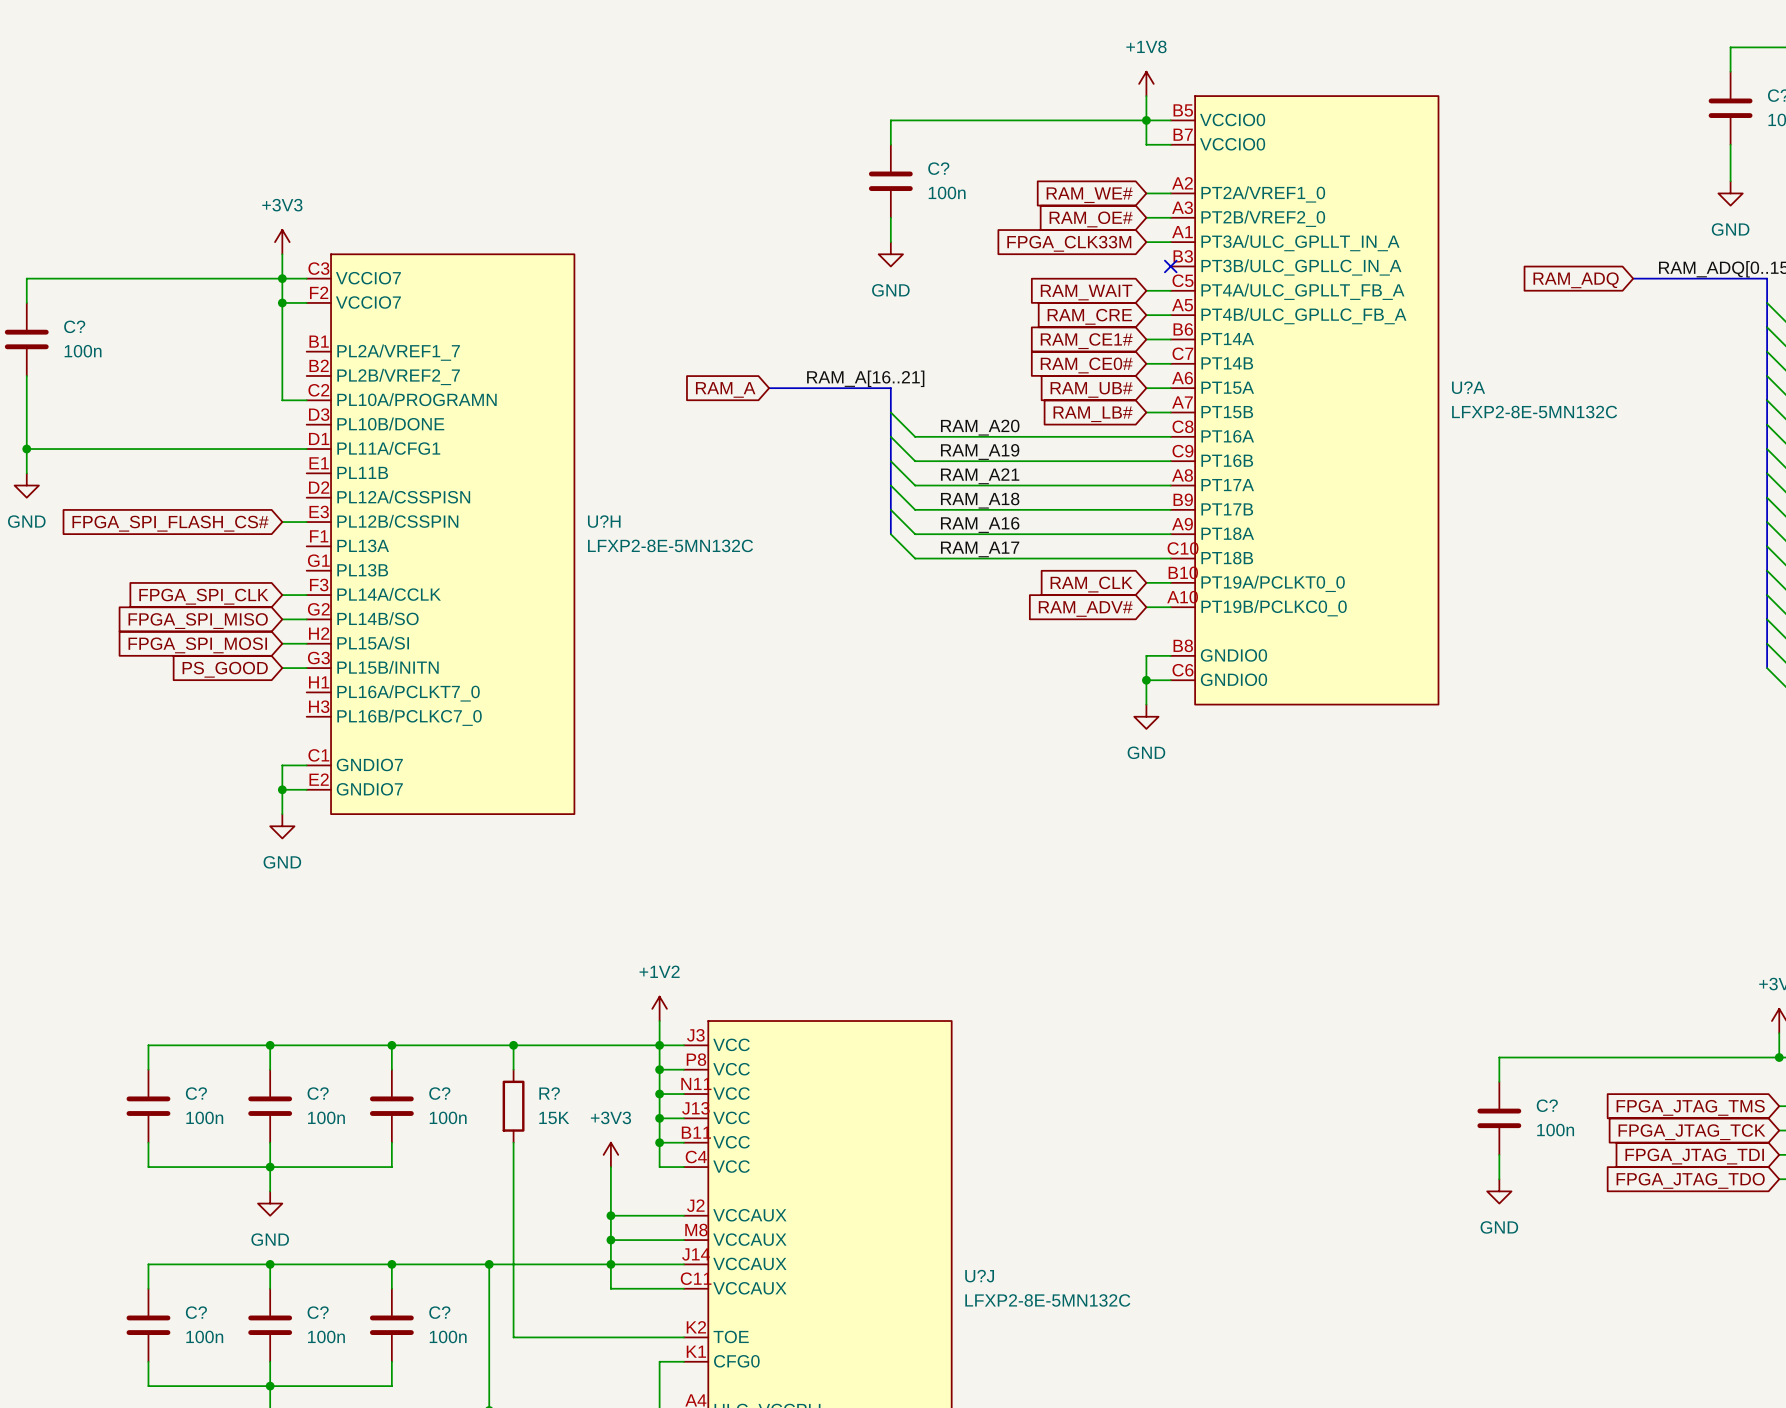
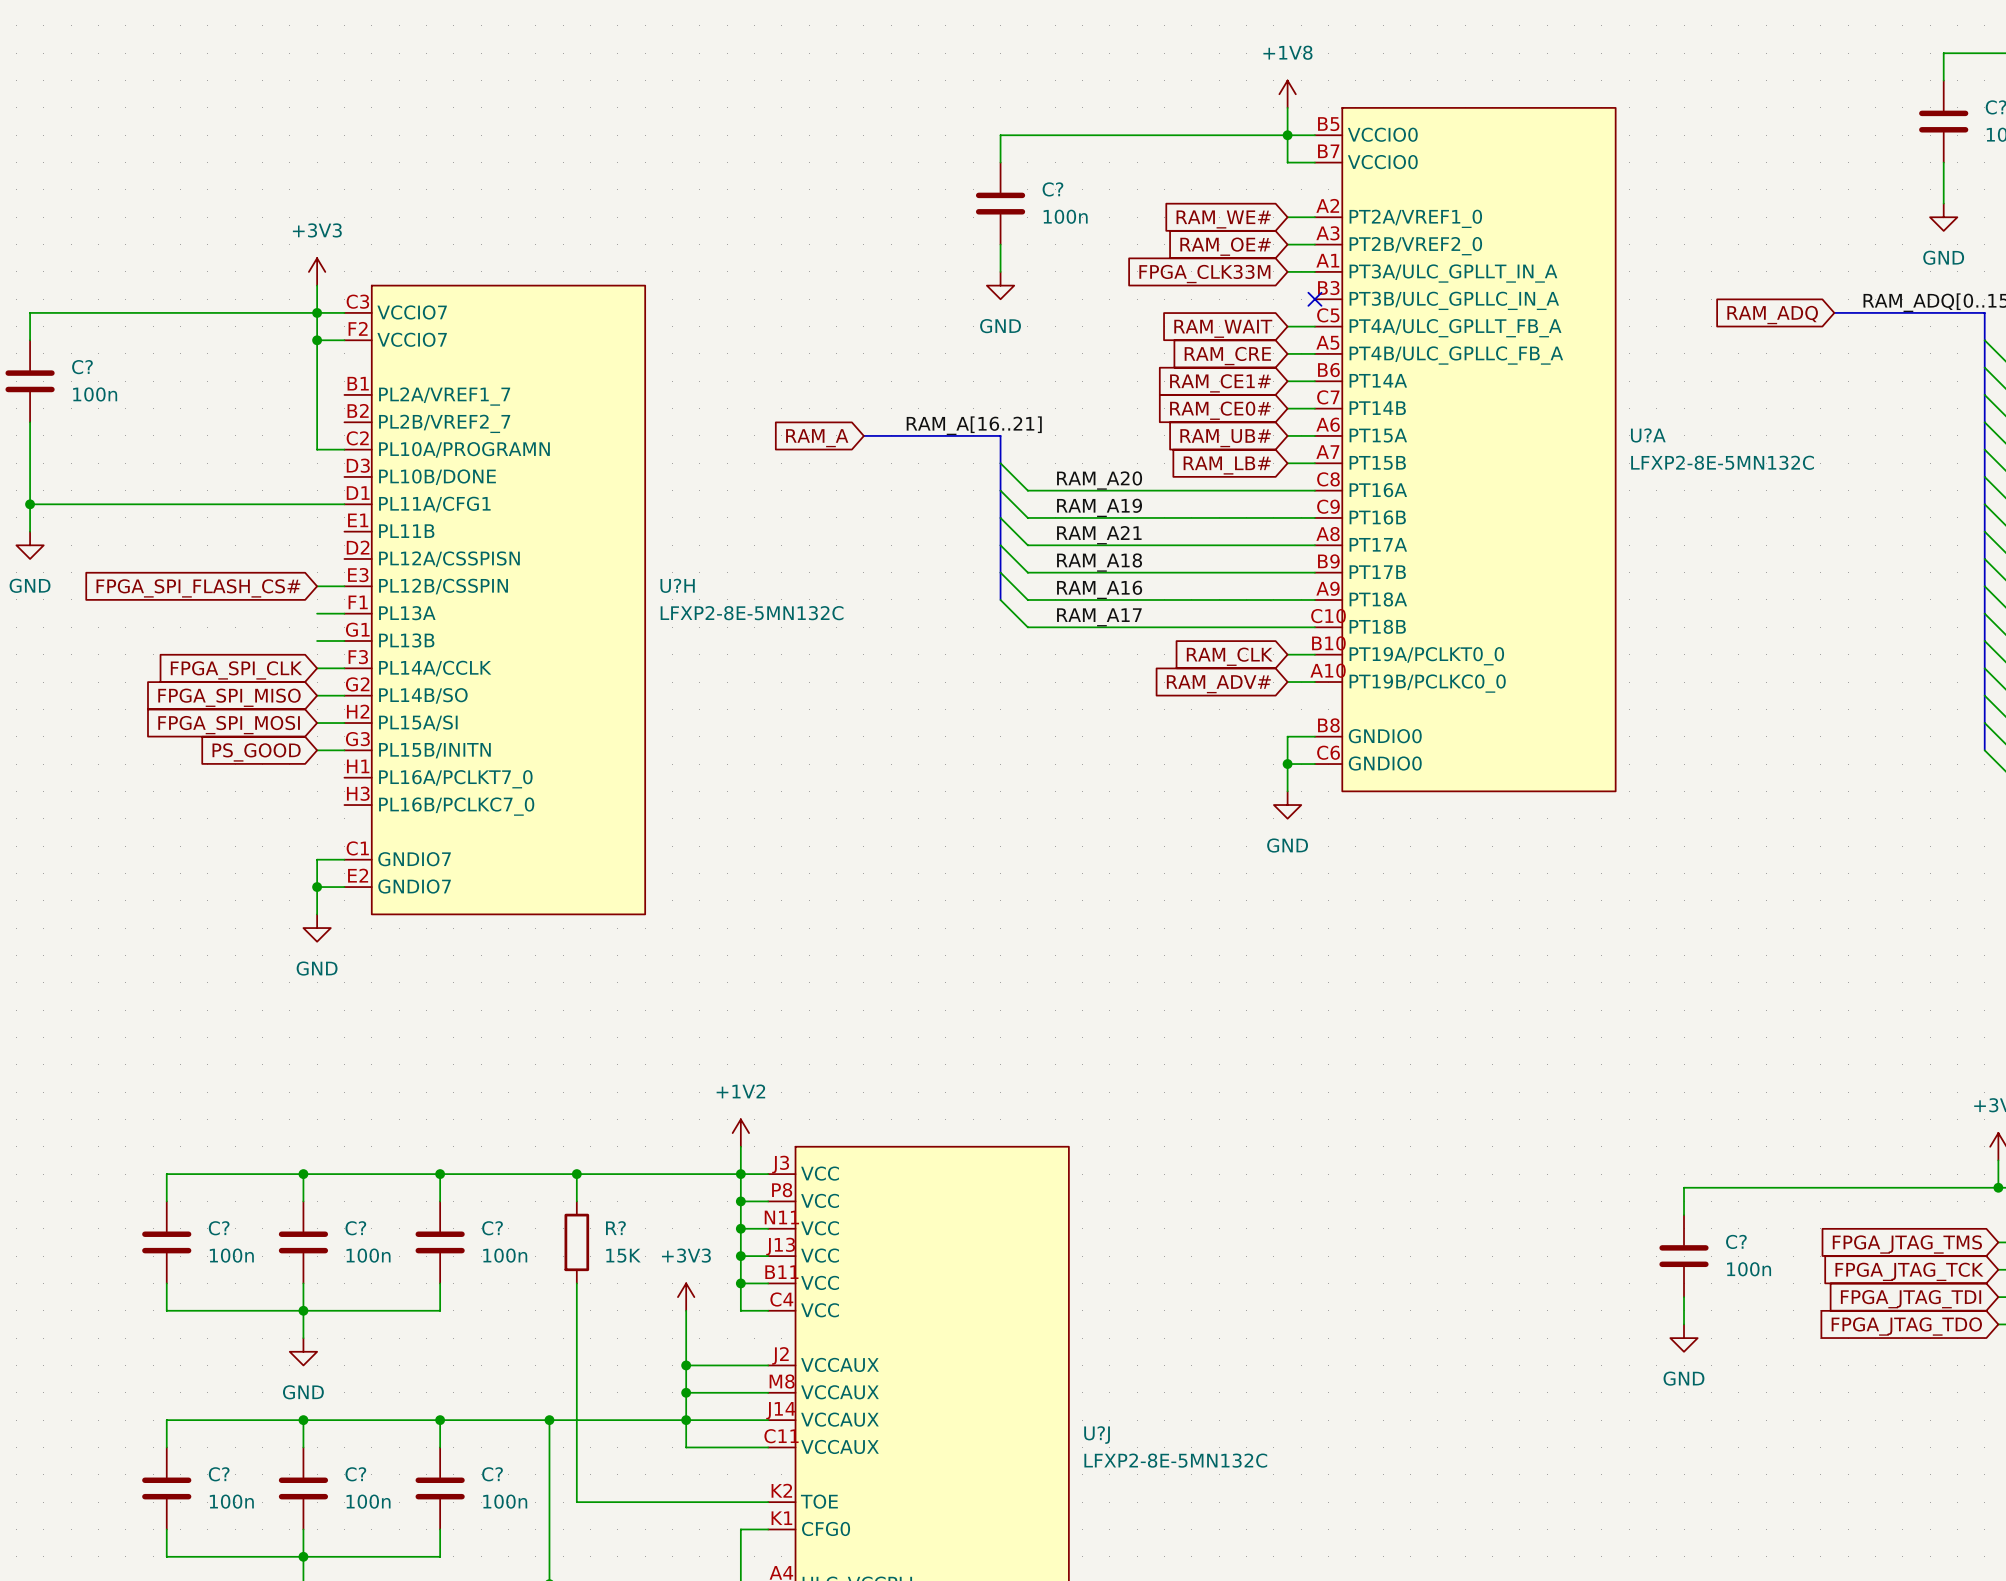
wire: none -> (317, 613) (344, 613)
wire: none -> (317, 641) (344, 641)

